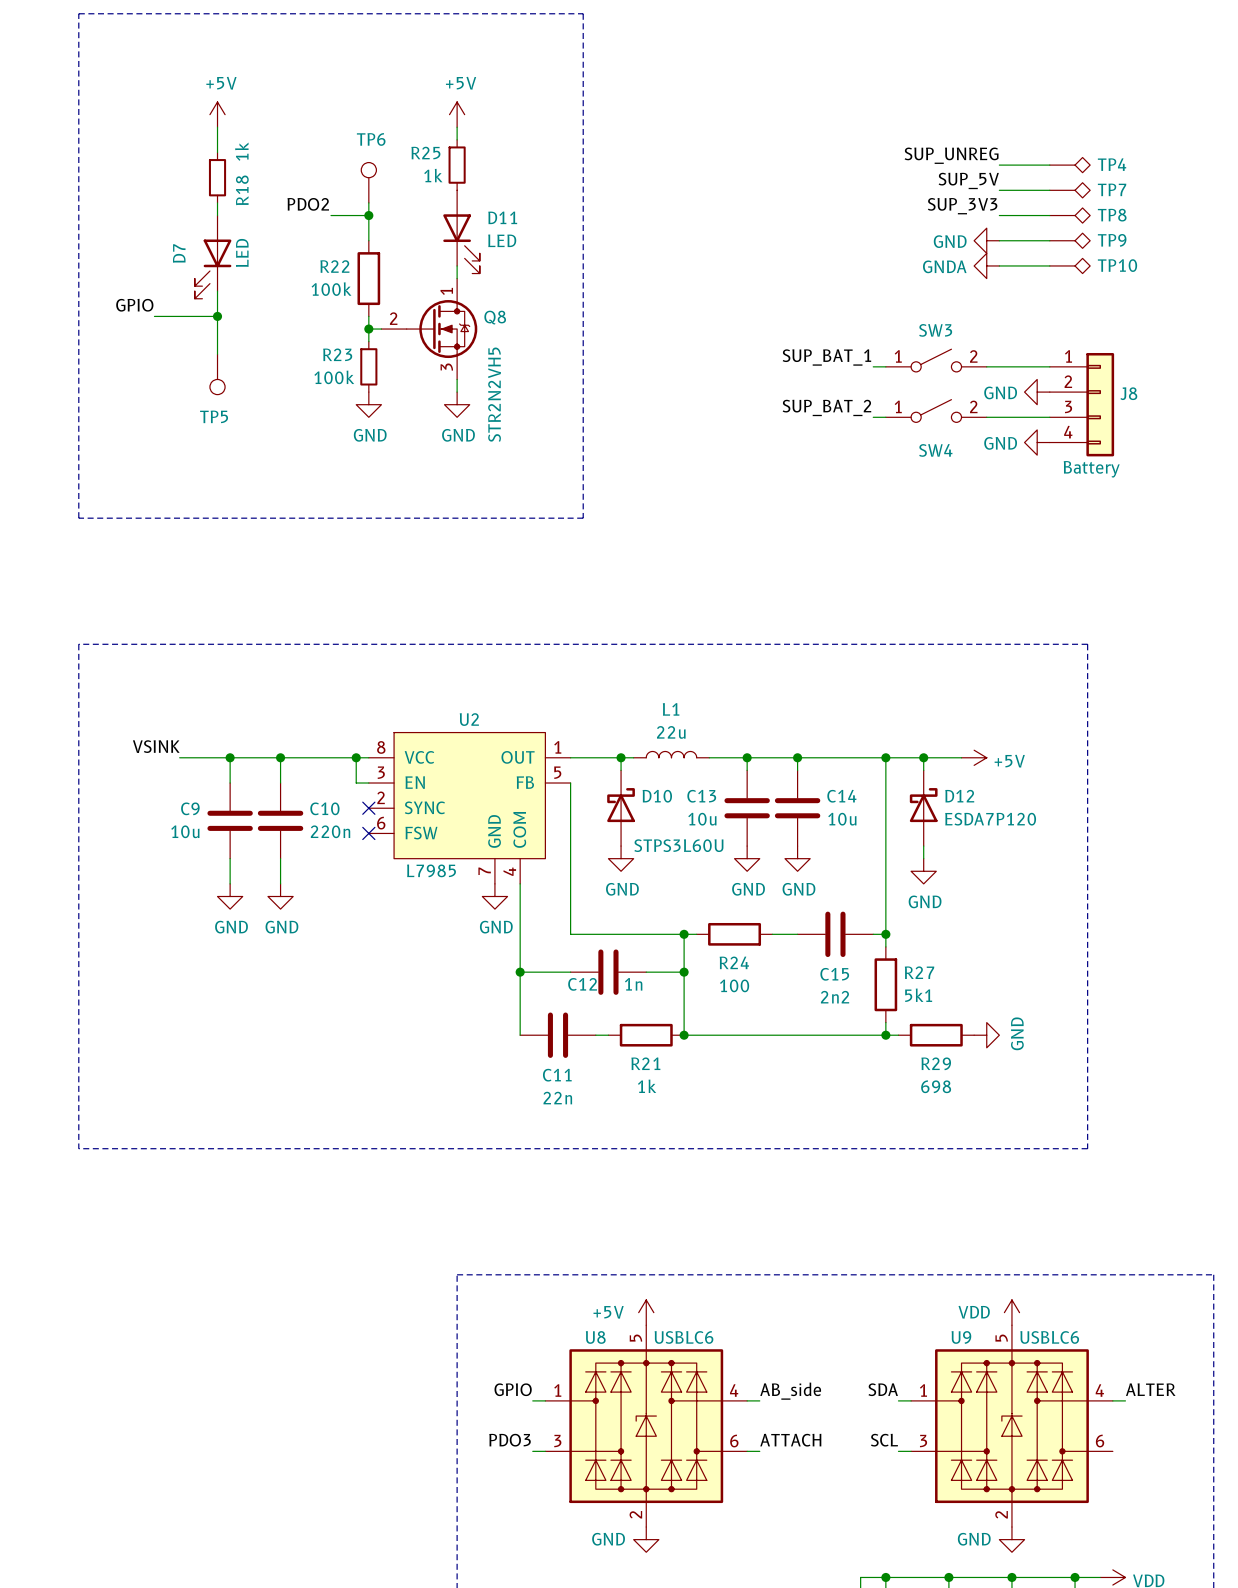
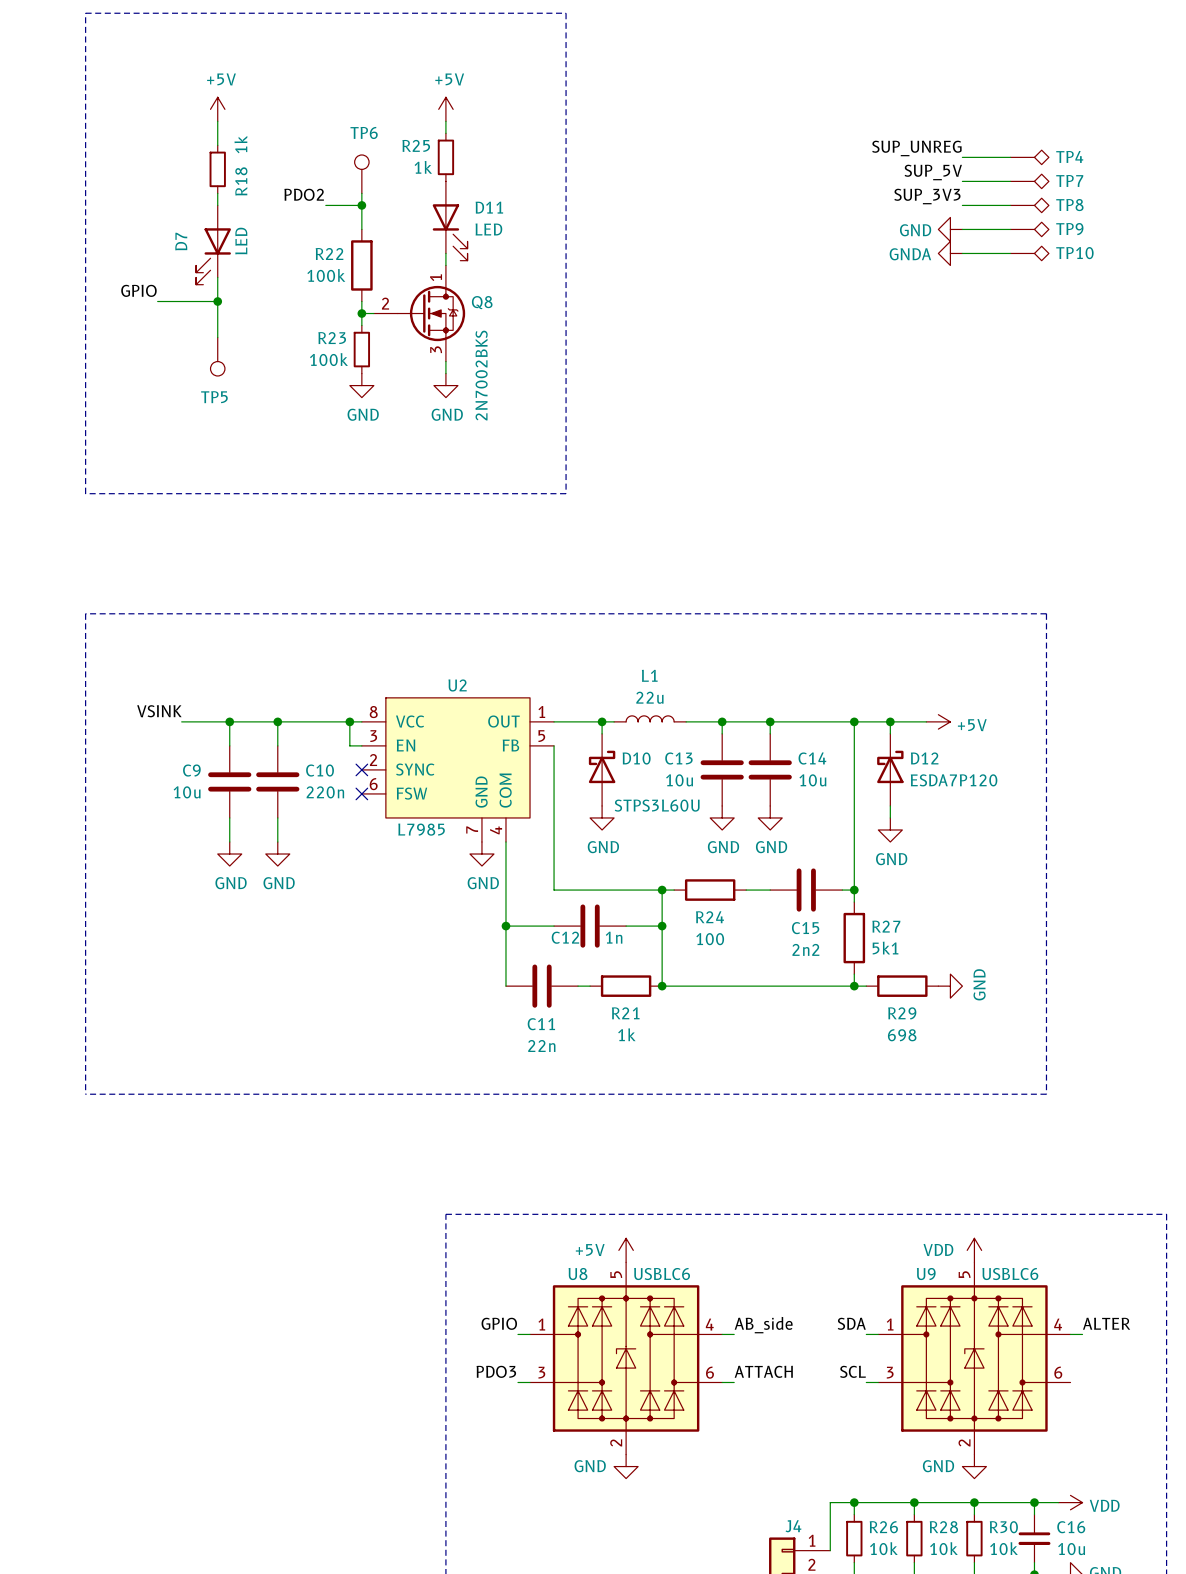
label: SUP_BAT_1 (826, 357) -> none
SW3: (936, 360) -> none
wire: (873, 366) (885, 366) -> none
wire: (986, 366) (1049, 366) -> none
power symbol: GND (1037, 392) -> none
Q8 value: STR2N2VH5 (494, 394) -> 2N7002BKS (481, 375)
J8: Battery (1081, 404) -> none
label: SUP_BAT_2 (826, 407) -> none
SW4: (936, 410) -> none
wire: (873, 417) (885, 417) -> none
wire: (986, 417) (1049, 417) -> none
power symbol: GND (1037, 442) -> none

